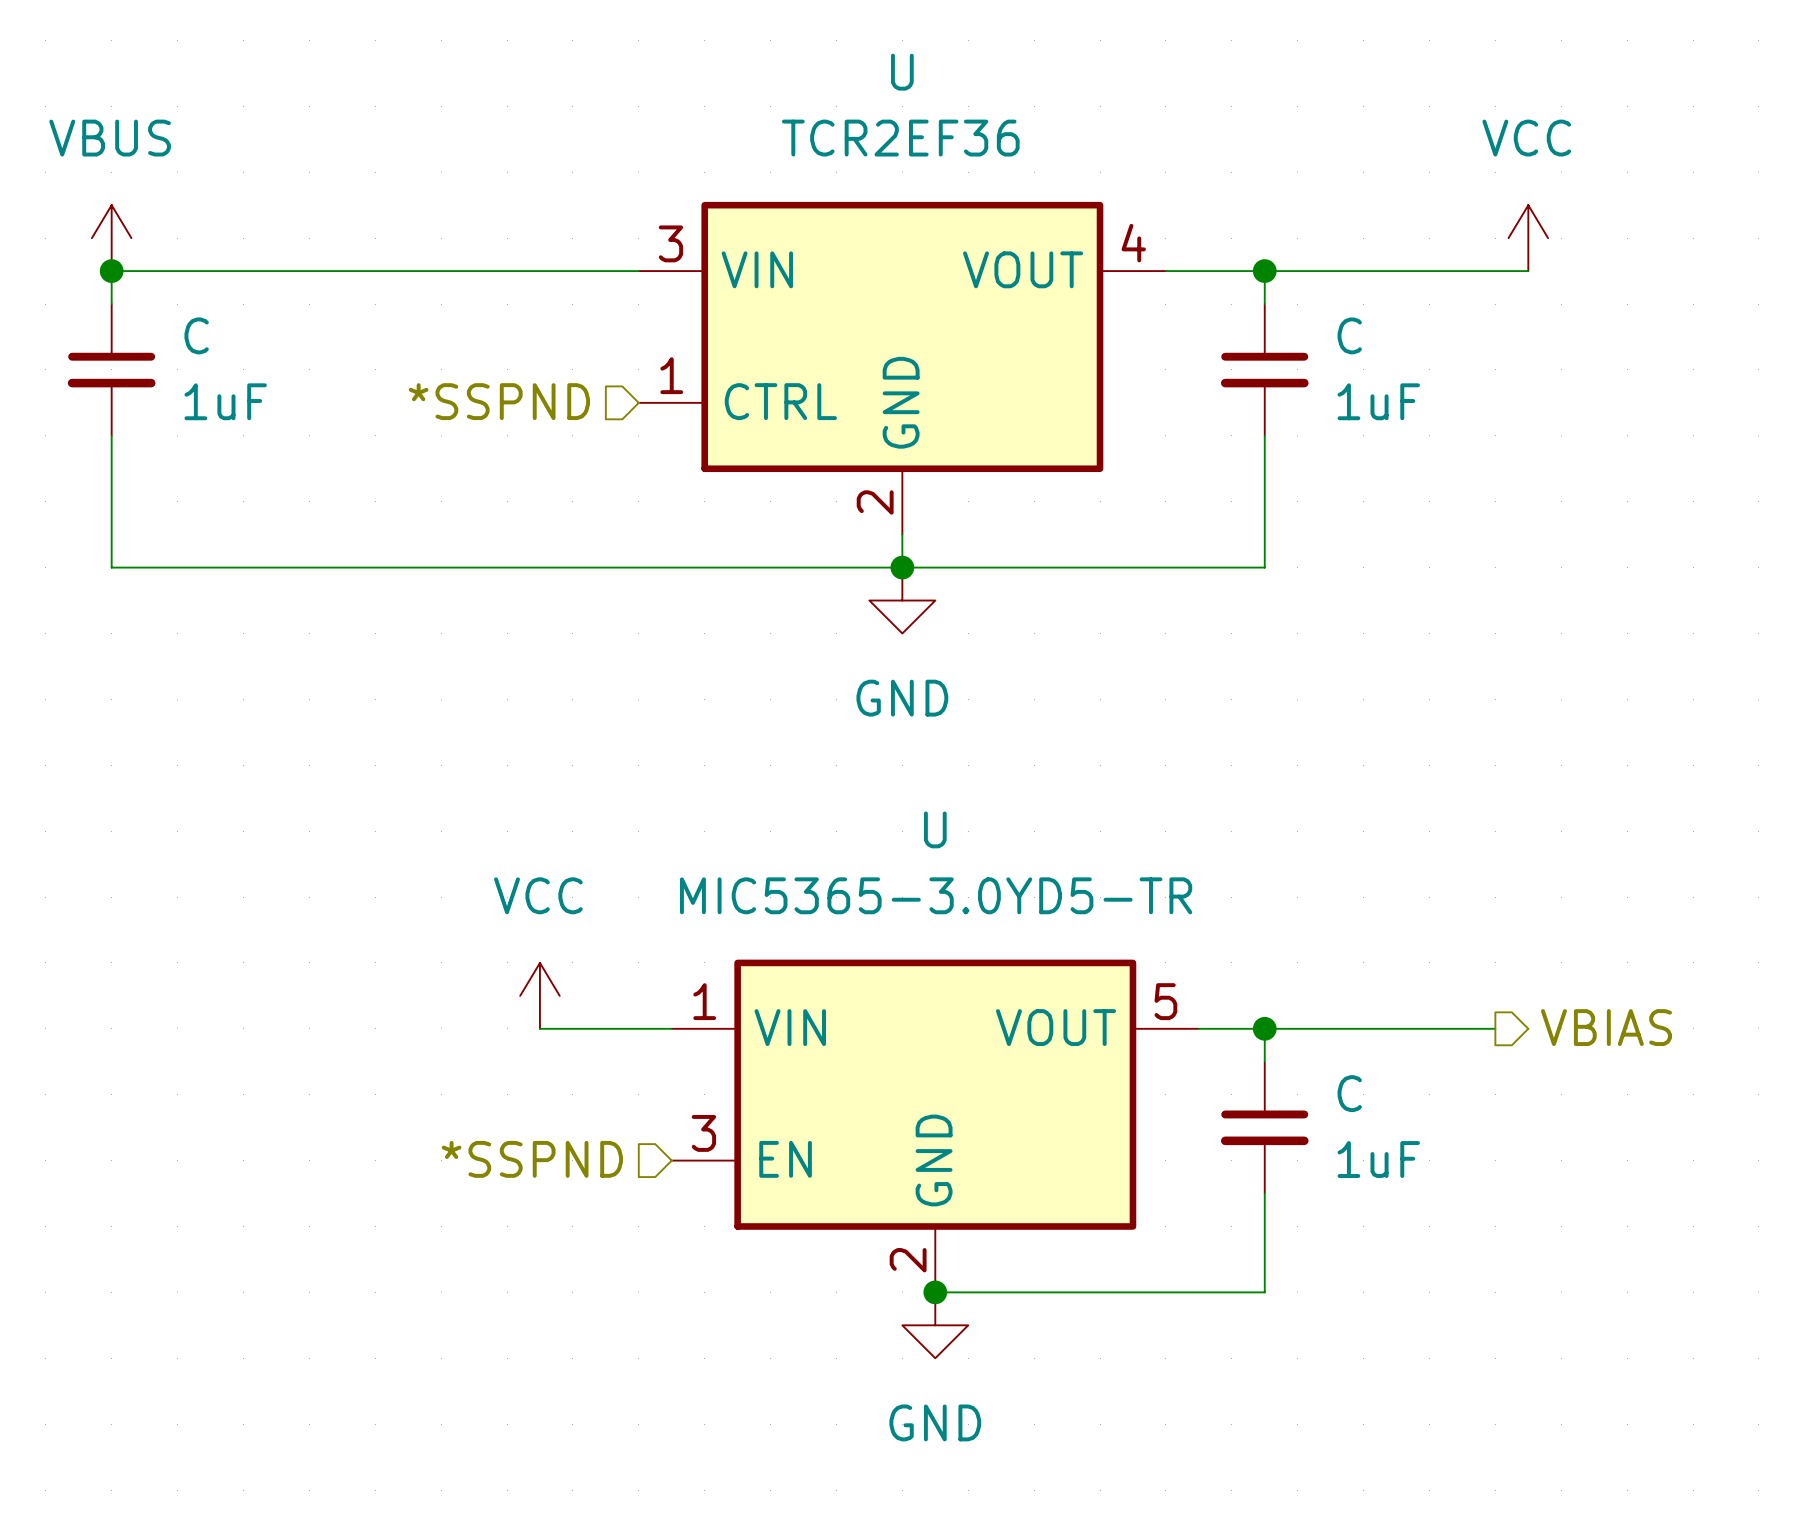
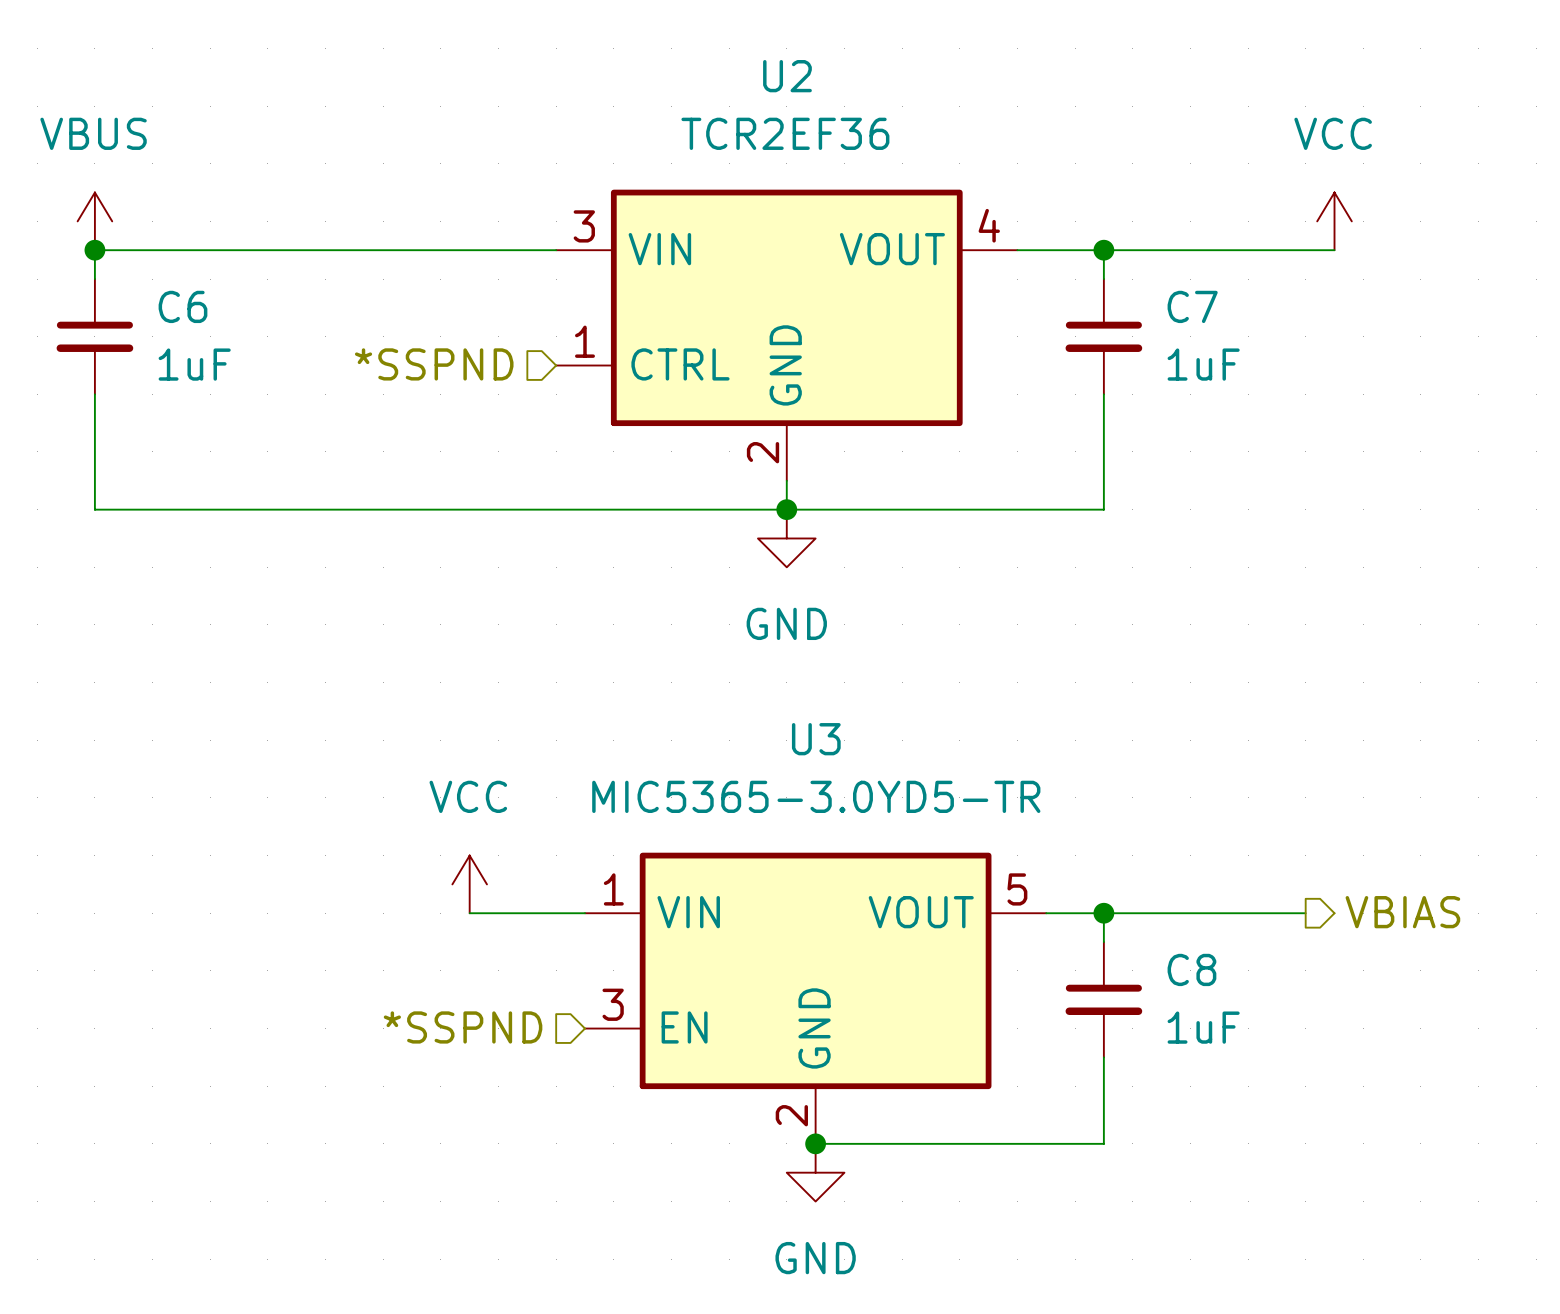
U name: U (902, 72) -> U2 (787, 76)
C name: C (196, 335) -> C6 (182, 306)
C name: C (1349, 335) -> C7 (1192, 306)
U name: U (935, 829) -> U3 (816, 739)
C name: C (1349, 1093) -> C8 (1191, 969)

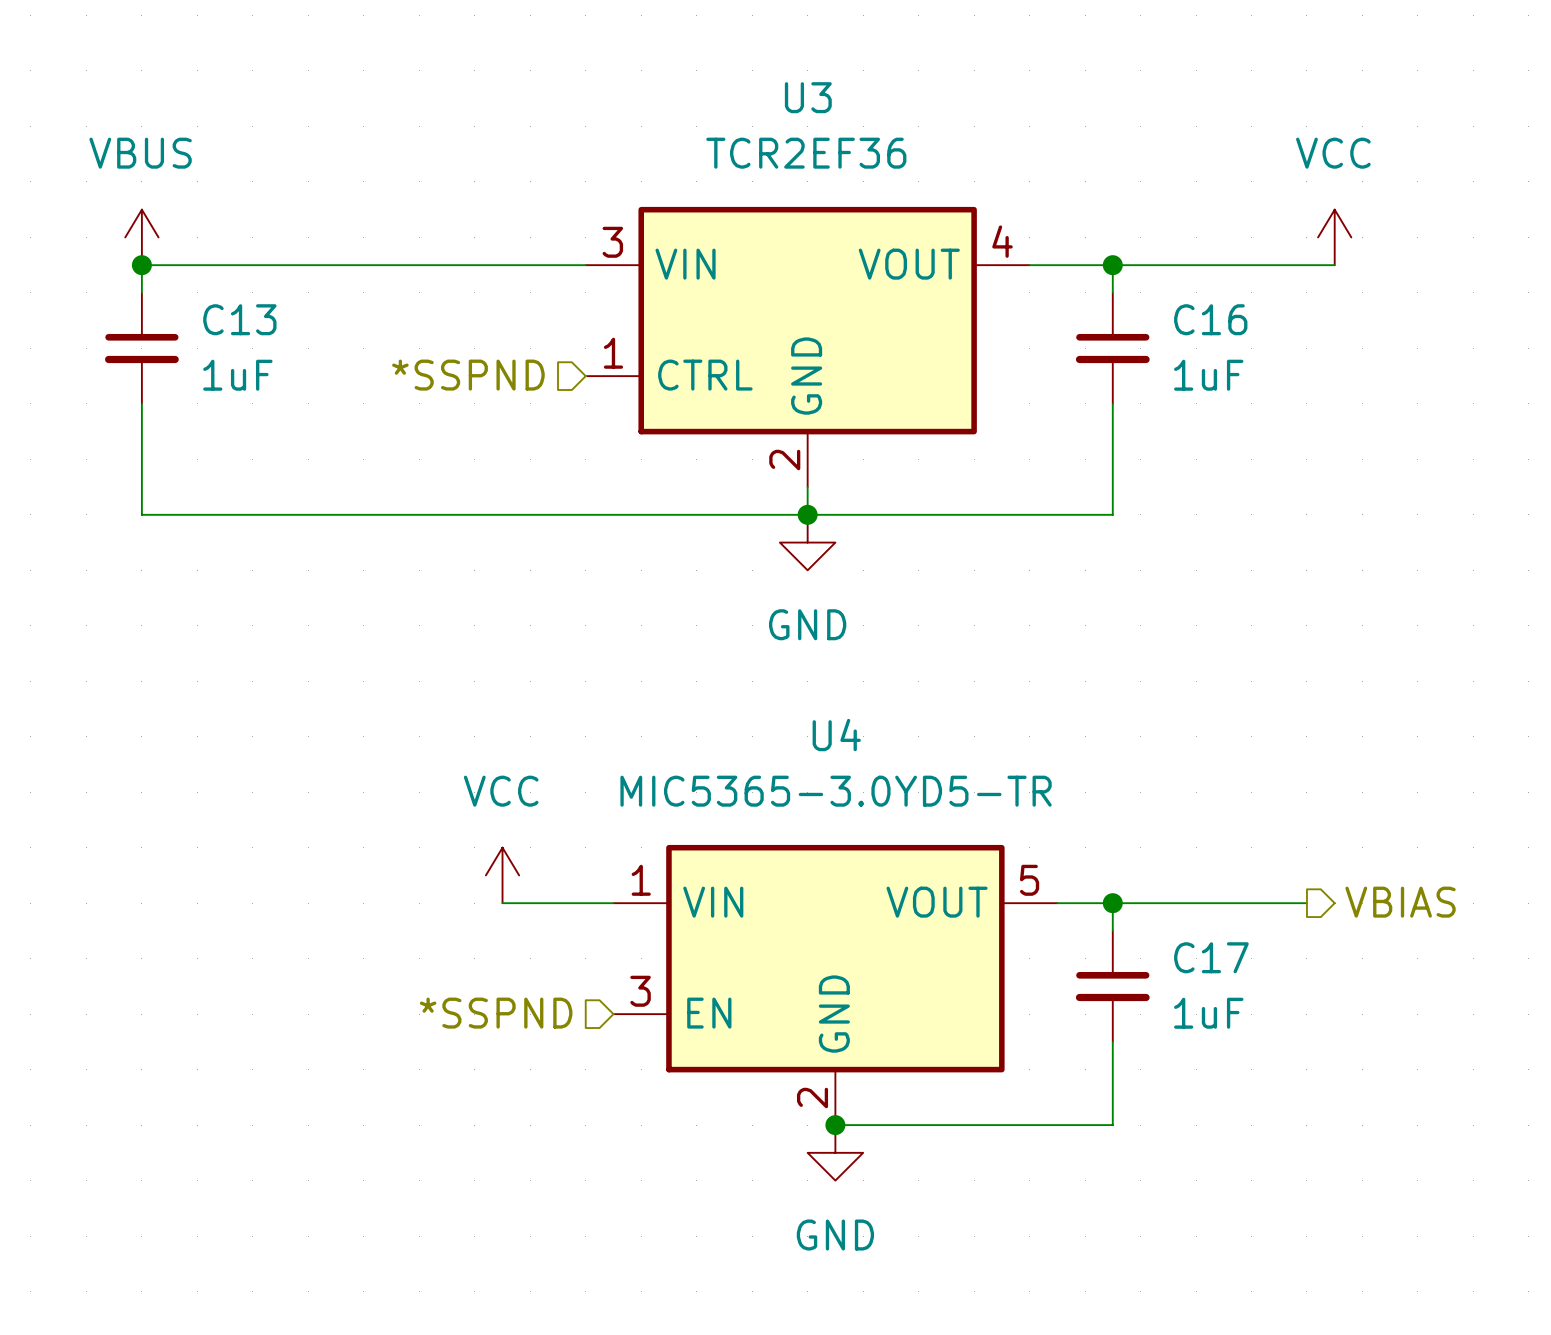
U2 name: U2 (787, 76) -> U3 (808, 97)
C6 name: C6 (182, 306) -> C13 (239, 319)
C7 name: C7 (1192, 306) -> C16 (1210, 319)
U3 name: U3 (816, 739) -> U4 (836, 735)
C8 name: C8 (1191, 969) -> C17 (1211, 957)

